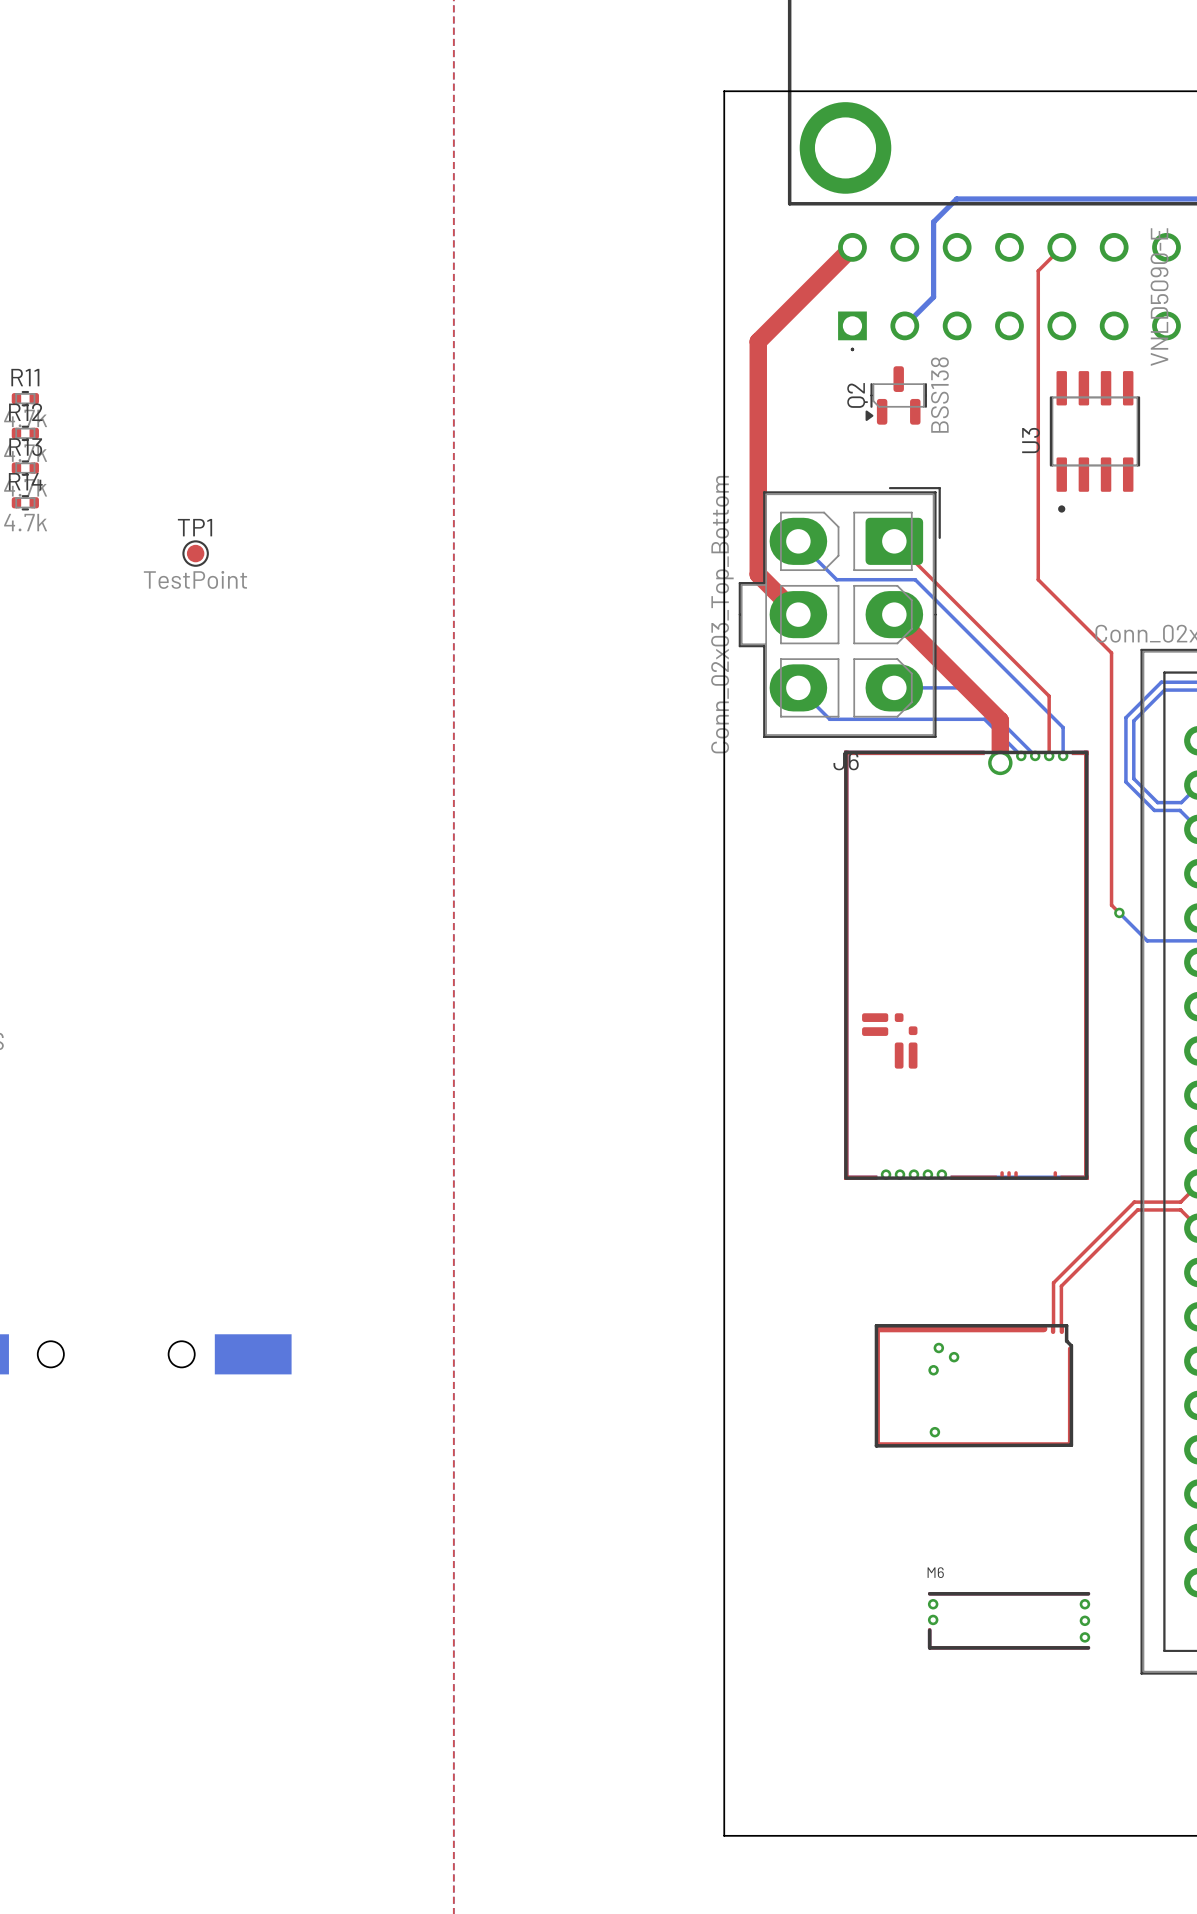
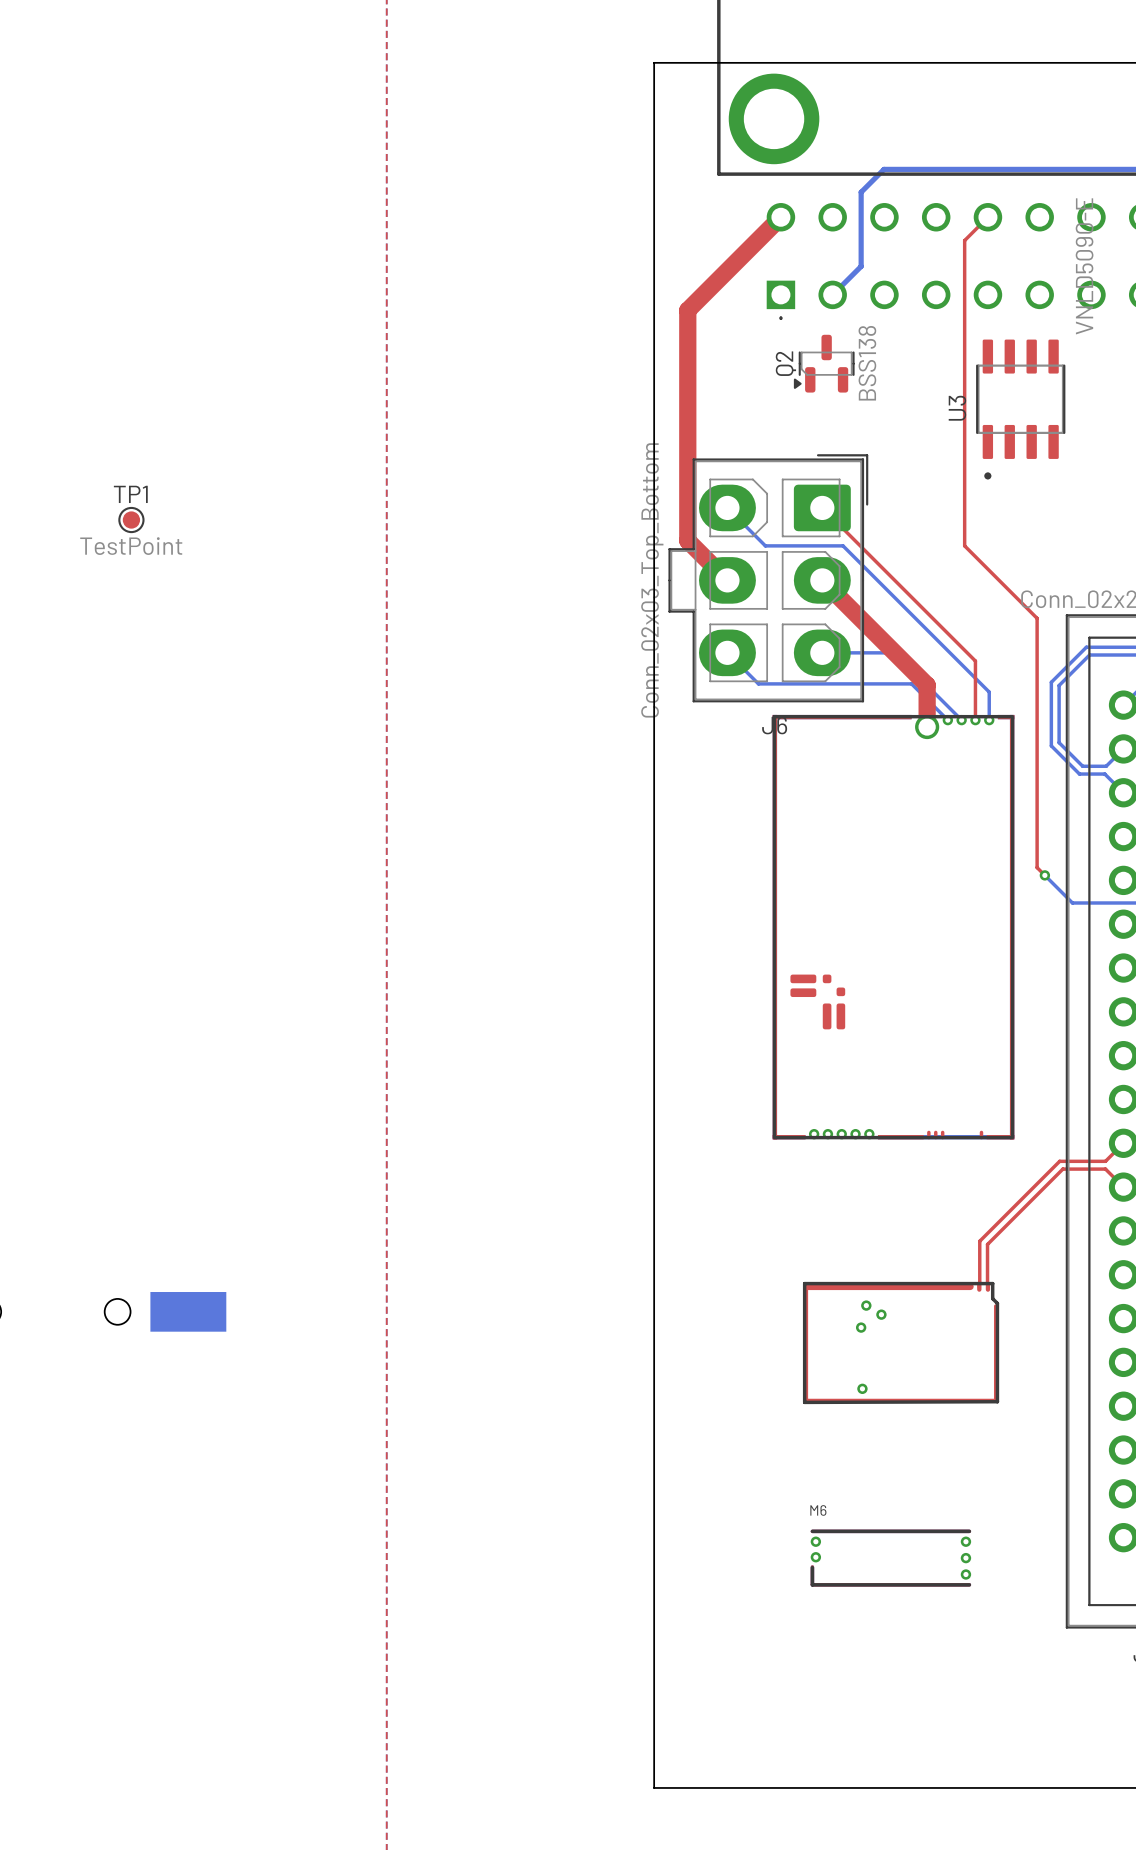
M6 position: (1009, 1620) -> (890, 1558)

